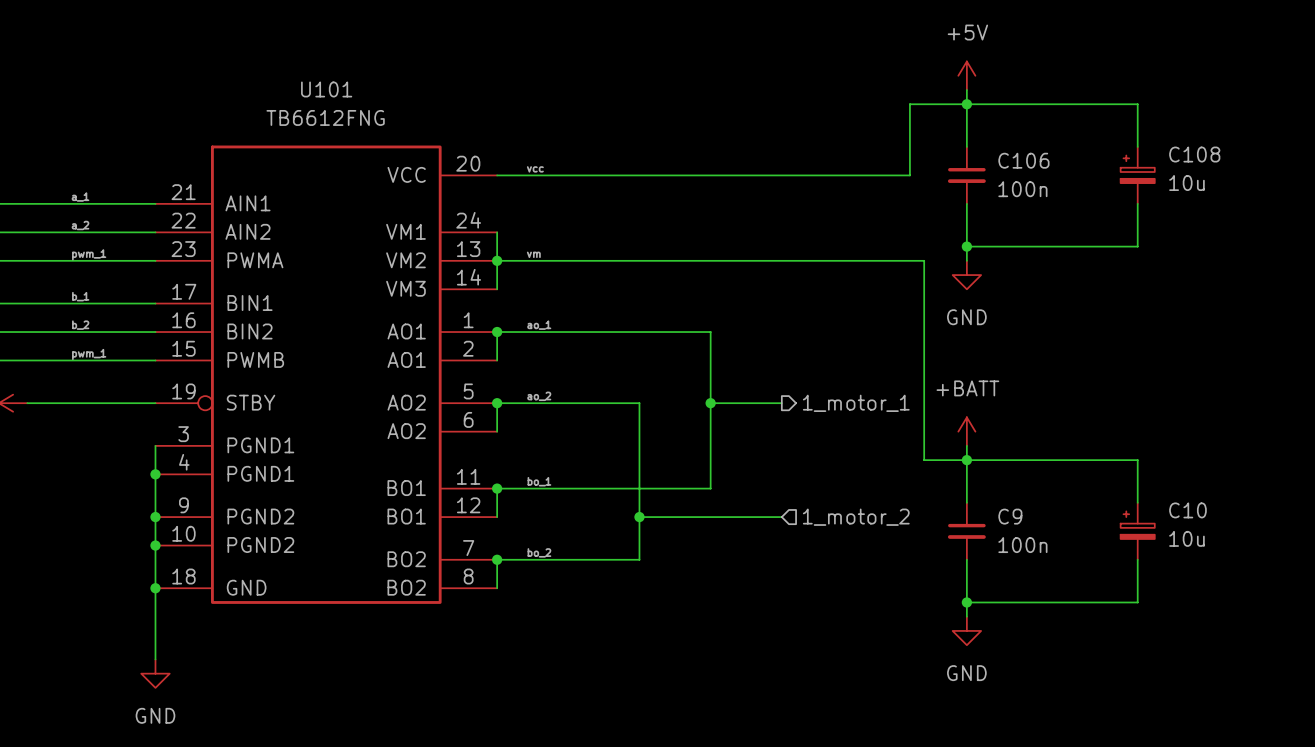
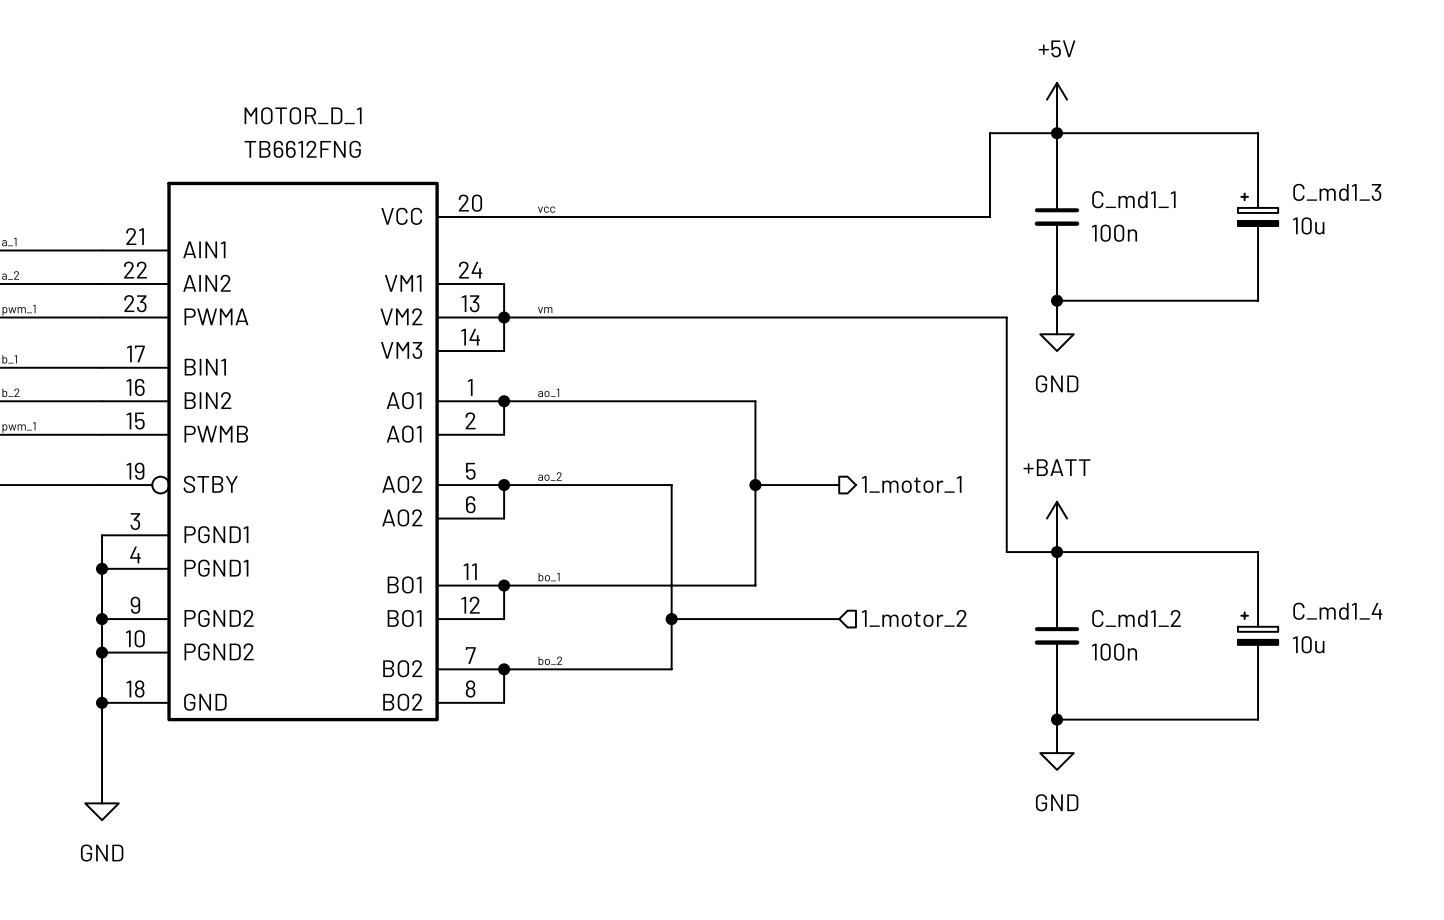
U101 name: U101 (326, 89) -> MOTOR_D_1 (303, 115)
C108 name: C108 (1194, 154) -> C_md1_3 (1337, 192)
C106 name: C106 (1023, 160) -> C_md1_1 (1133, 199)
C10 name: C10 (1187, 510) -> C_md1_4 (1337, 611)
C9 name: C9 (1010, 516) -> C_md1_2 (1136, 618)

